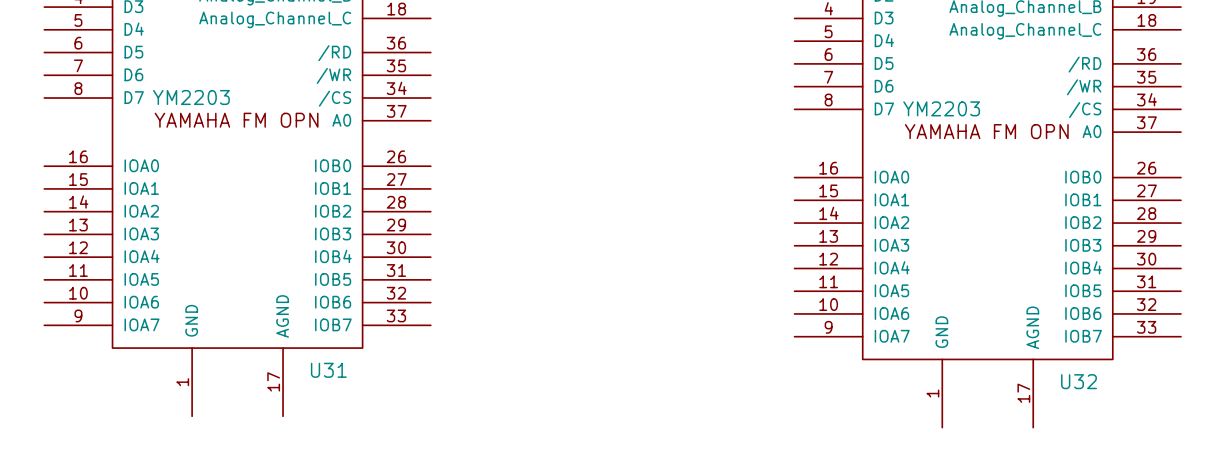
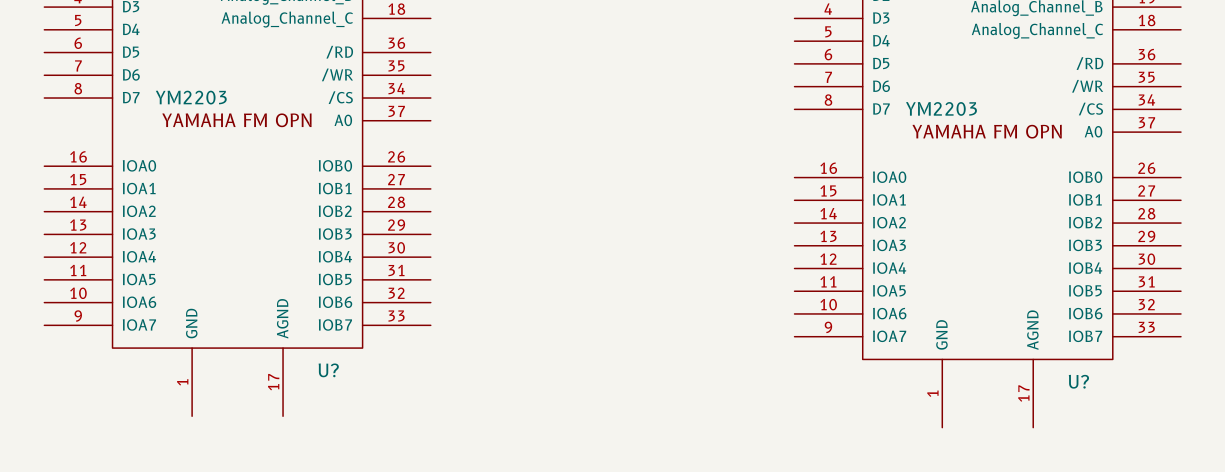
U31 name: U31 (328, 370) -> U? (328, 370)
U32 name: U32 (1079, 381) -> U? (1078, 381)

